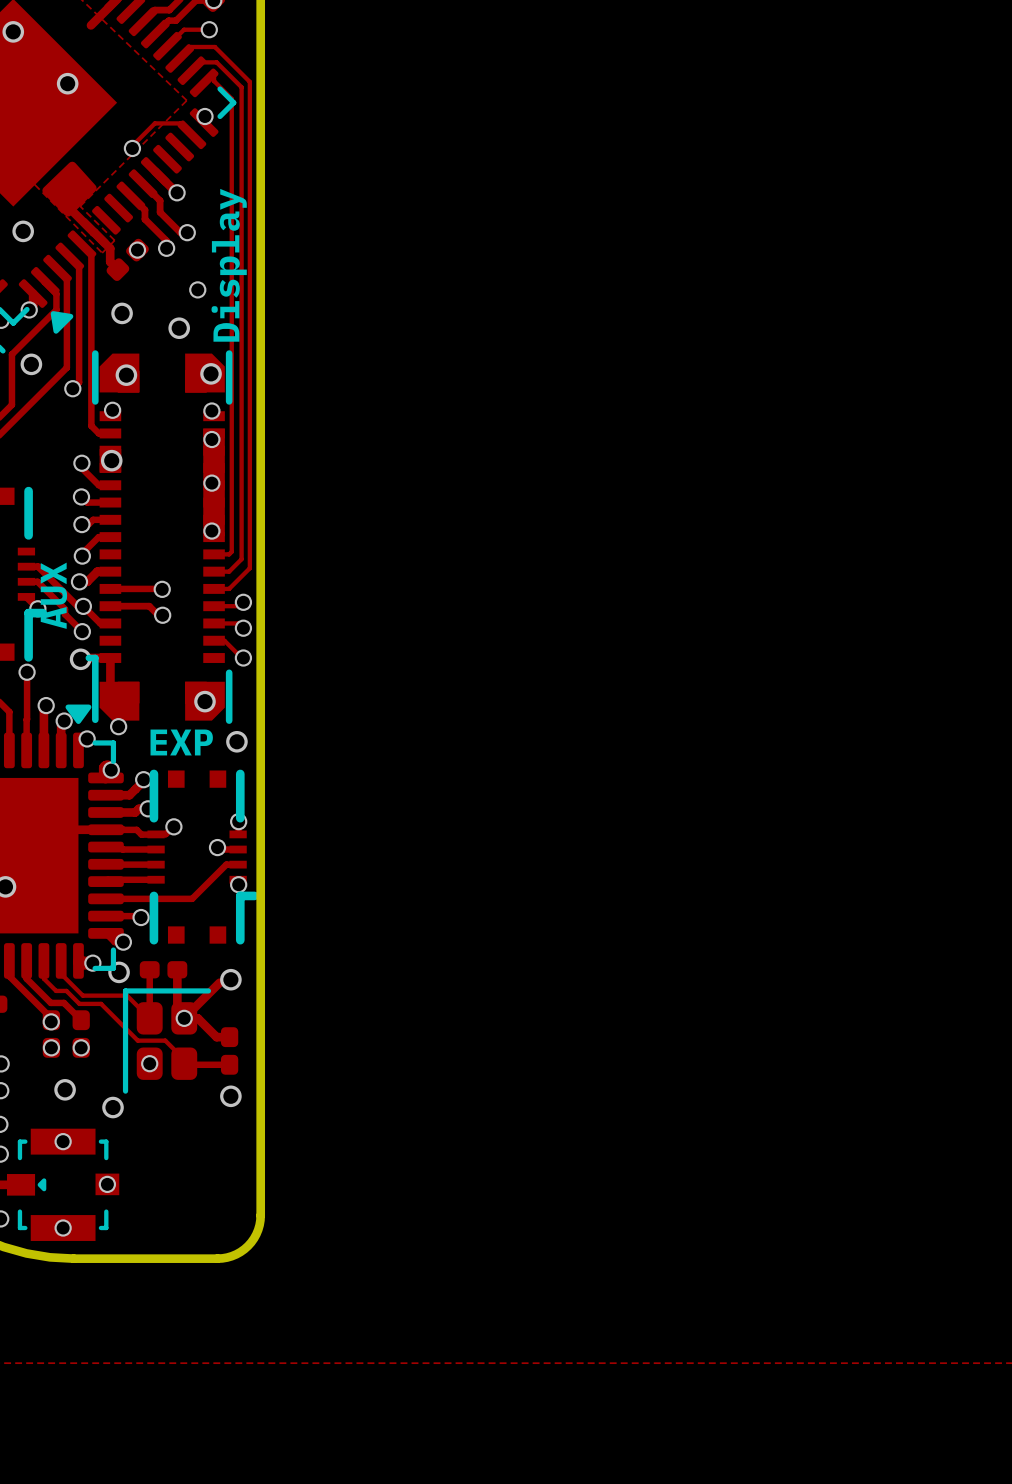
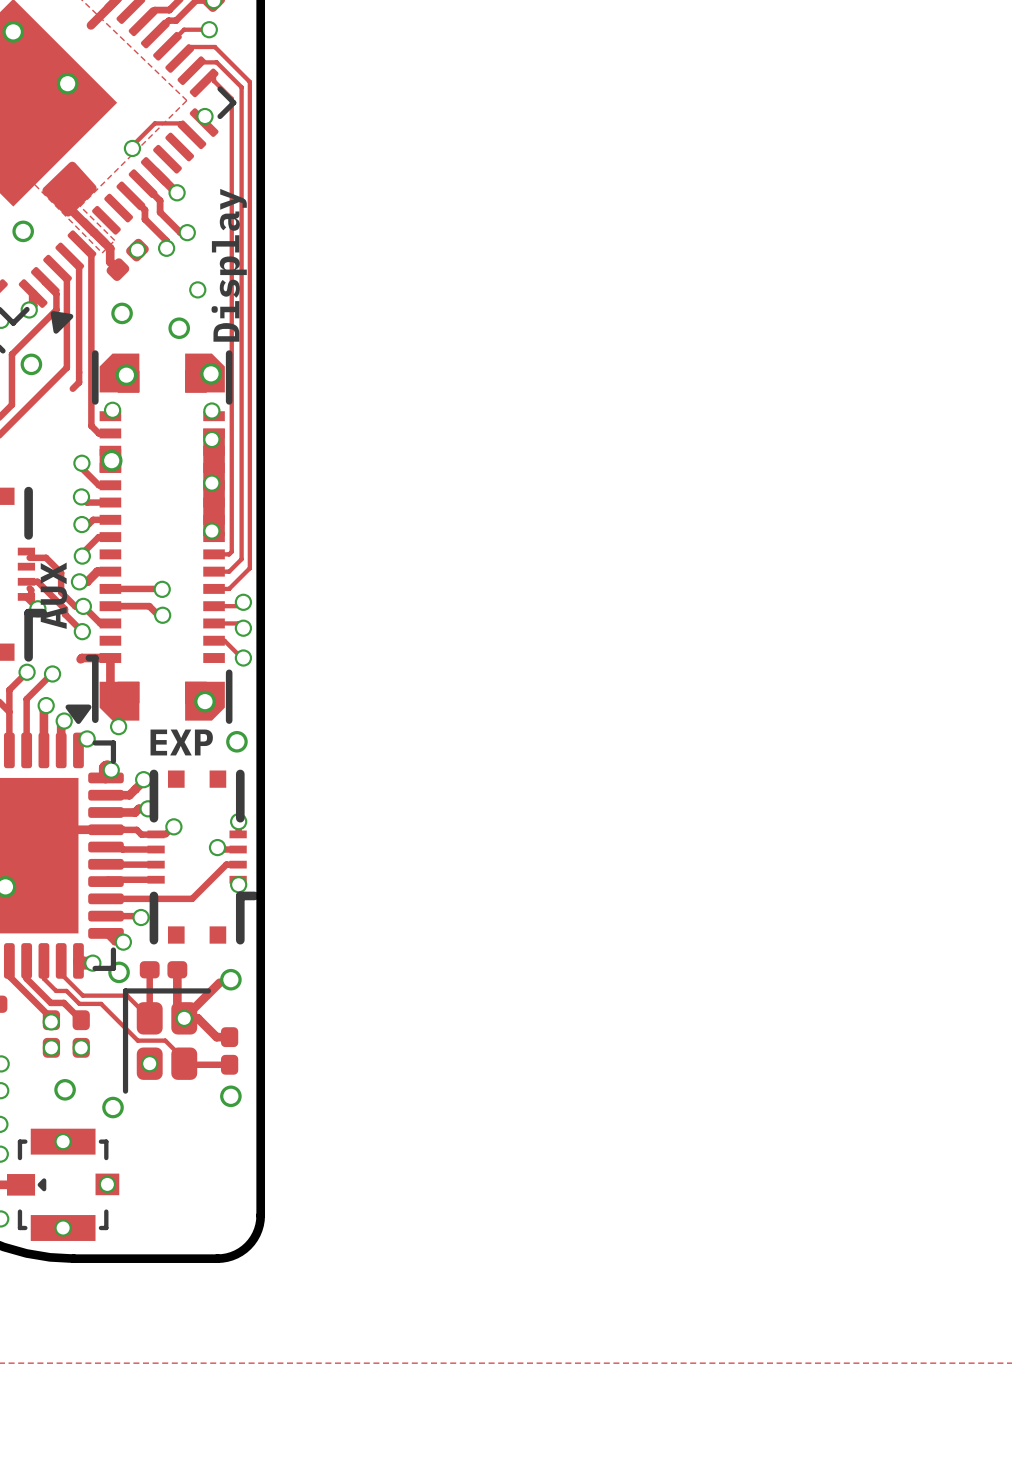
via: (72, 388) -> none
track: none -> (29, 557) (46, 557) (61, 572) (61, 592) (75, 606) (83, 606)
track: (26, 566) (38, 566) (77, 606) -> none
track: none -> (29, 588) (31, 600)
via: (80, 659) -> none
track: (27, 672) (27, 719) -> (51, 673) (26, 699) (26, 719)
track: none -> (25, 673) (9, 689) (9, 711)
via: none -> (52, 673)

